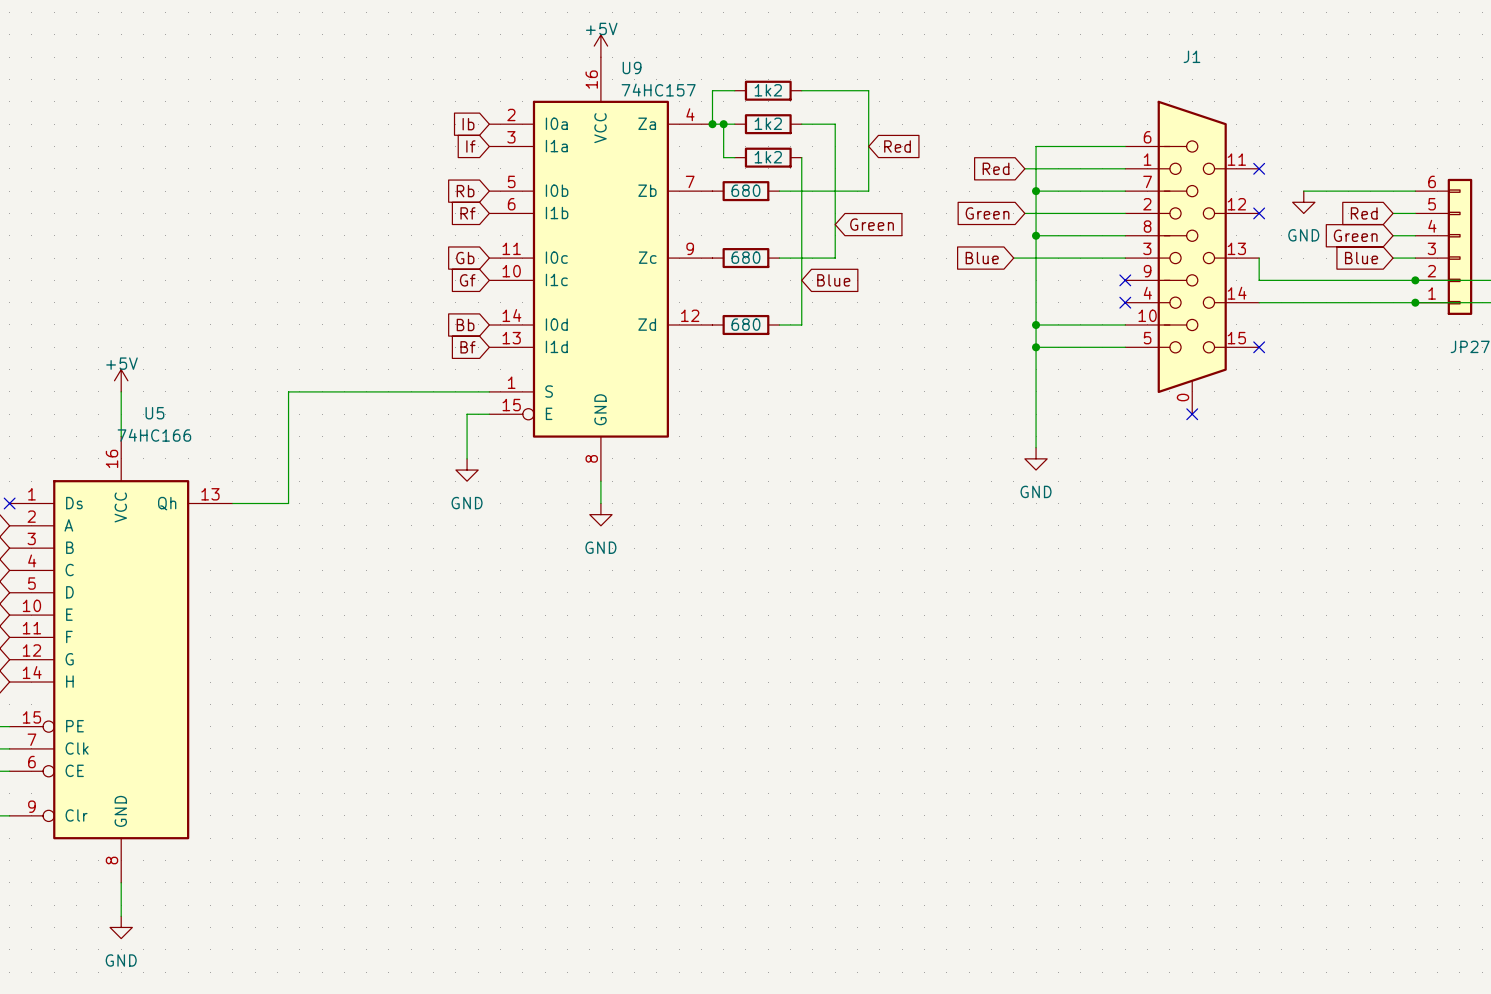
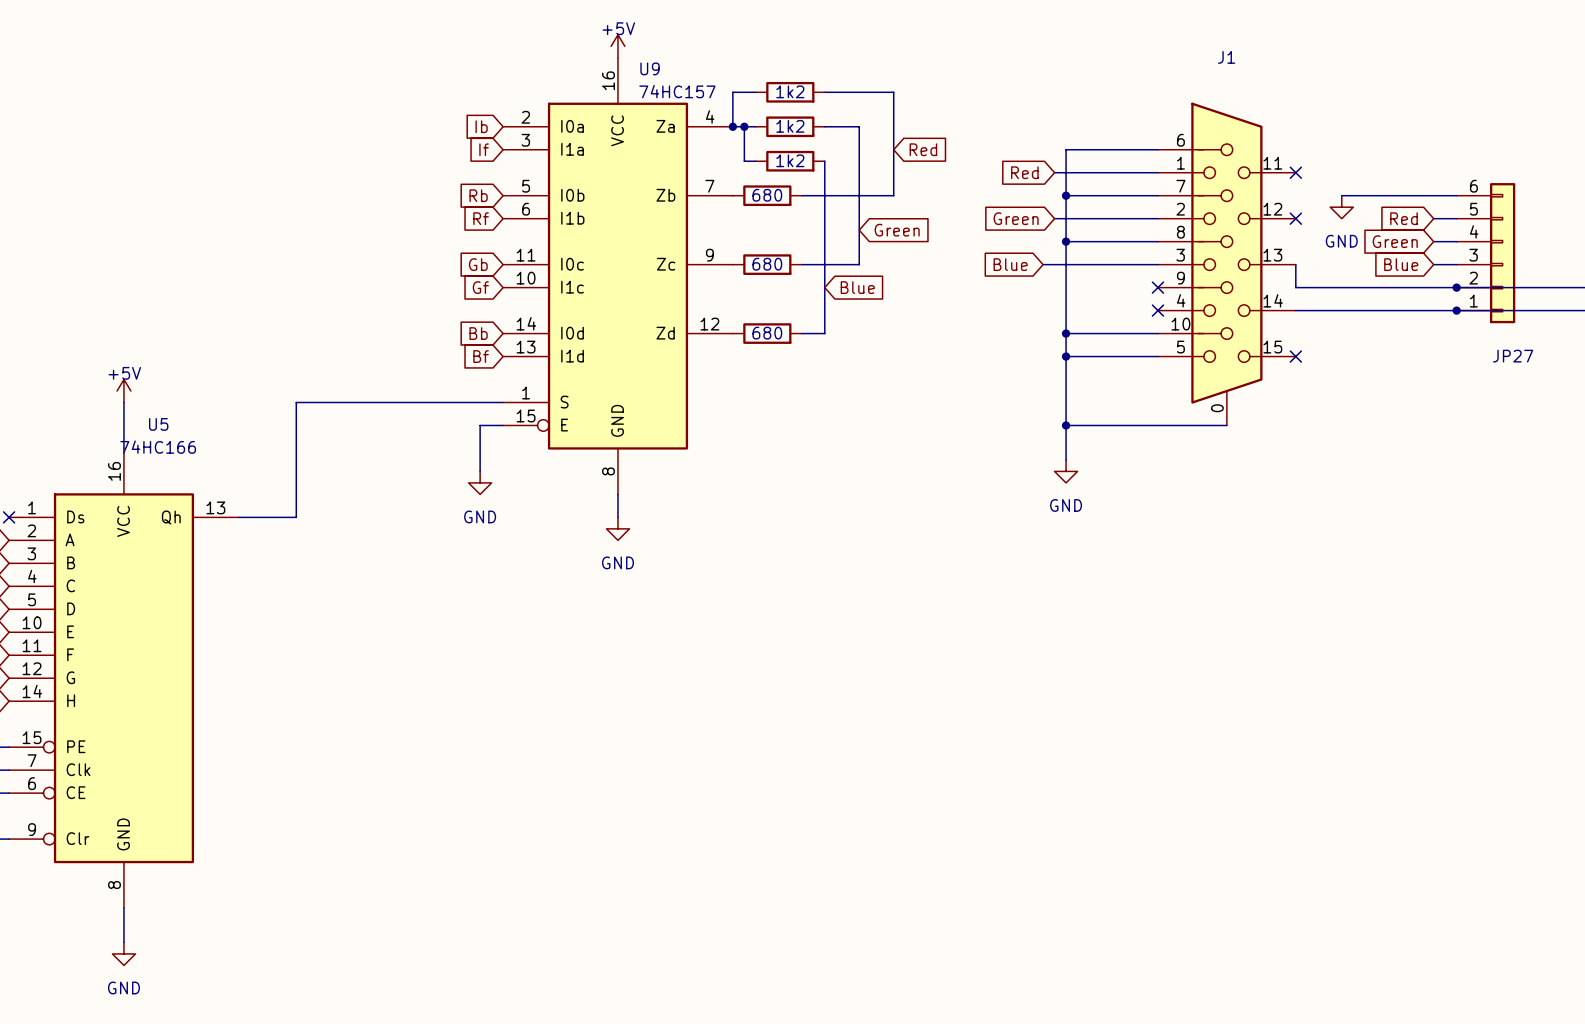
wire: none -> (1066, 425) (1226, 425)
junction: none -> (1066, 425)
no-connect mark: (1192, 414) -> none

